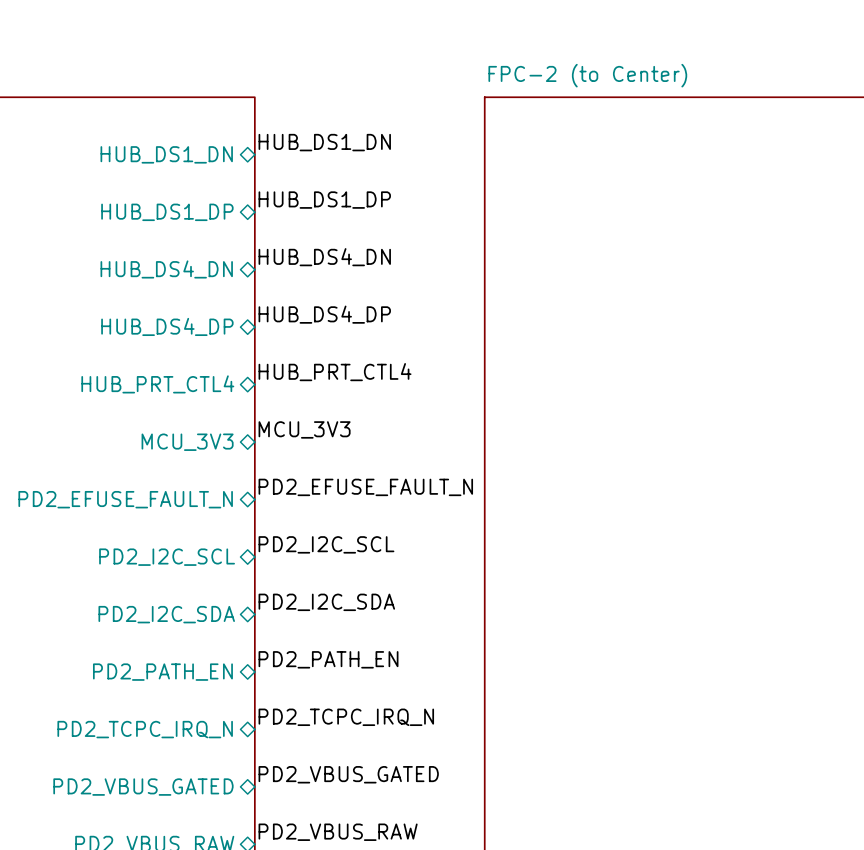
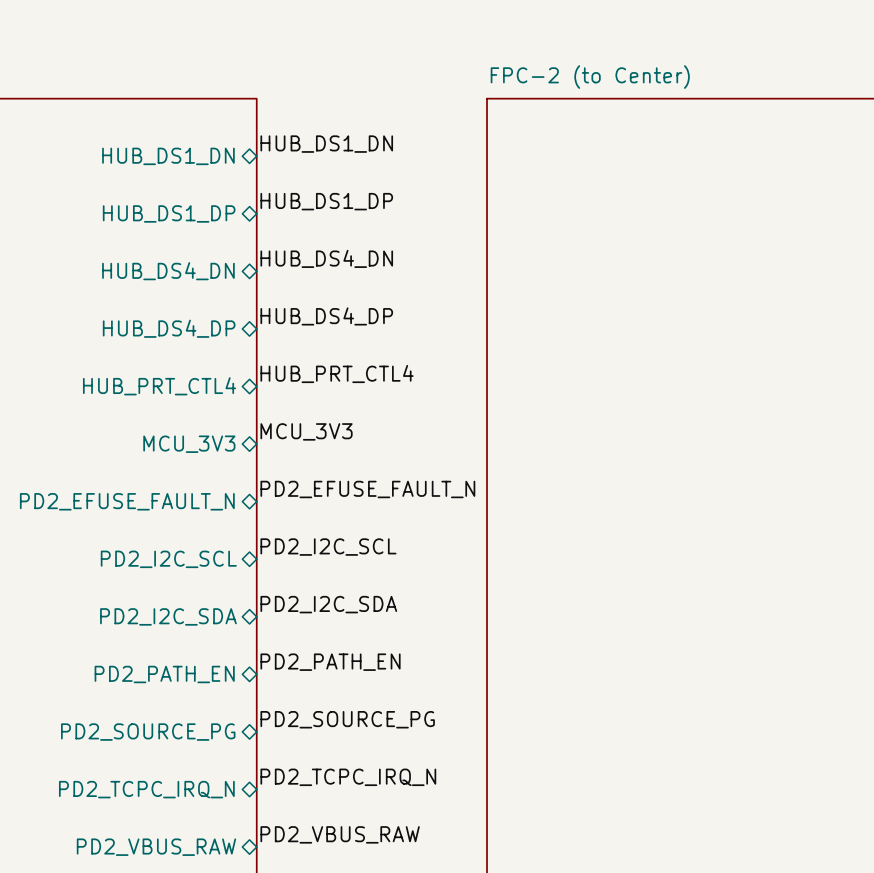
label: PD2_TCPC_IRQ_N (346, 717) -> PD2_SOURCE_PG (347, 719)
sheet pin: PD2_TCPC_IRQ_N (145, 729) -> PD2_SOURCE_PG (148, 732)
label: PD2_VBUS_GATED (348, 774) -> PD2_TCPC_IRQ_N (348, 777)
sheet pin: PD2_VBUS_GATED (143, 787) -> PD2_TCPC_IRQ_N (146, 789)

